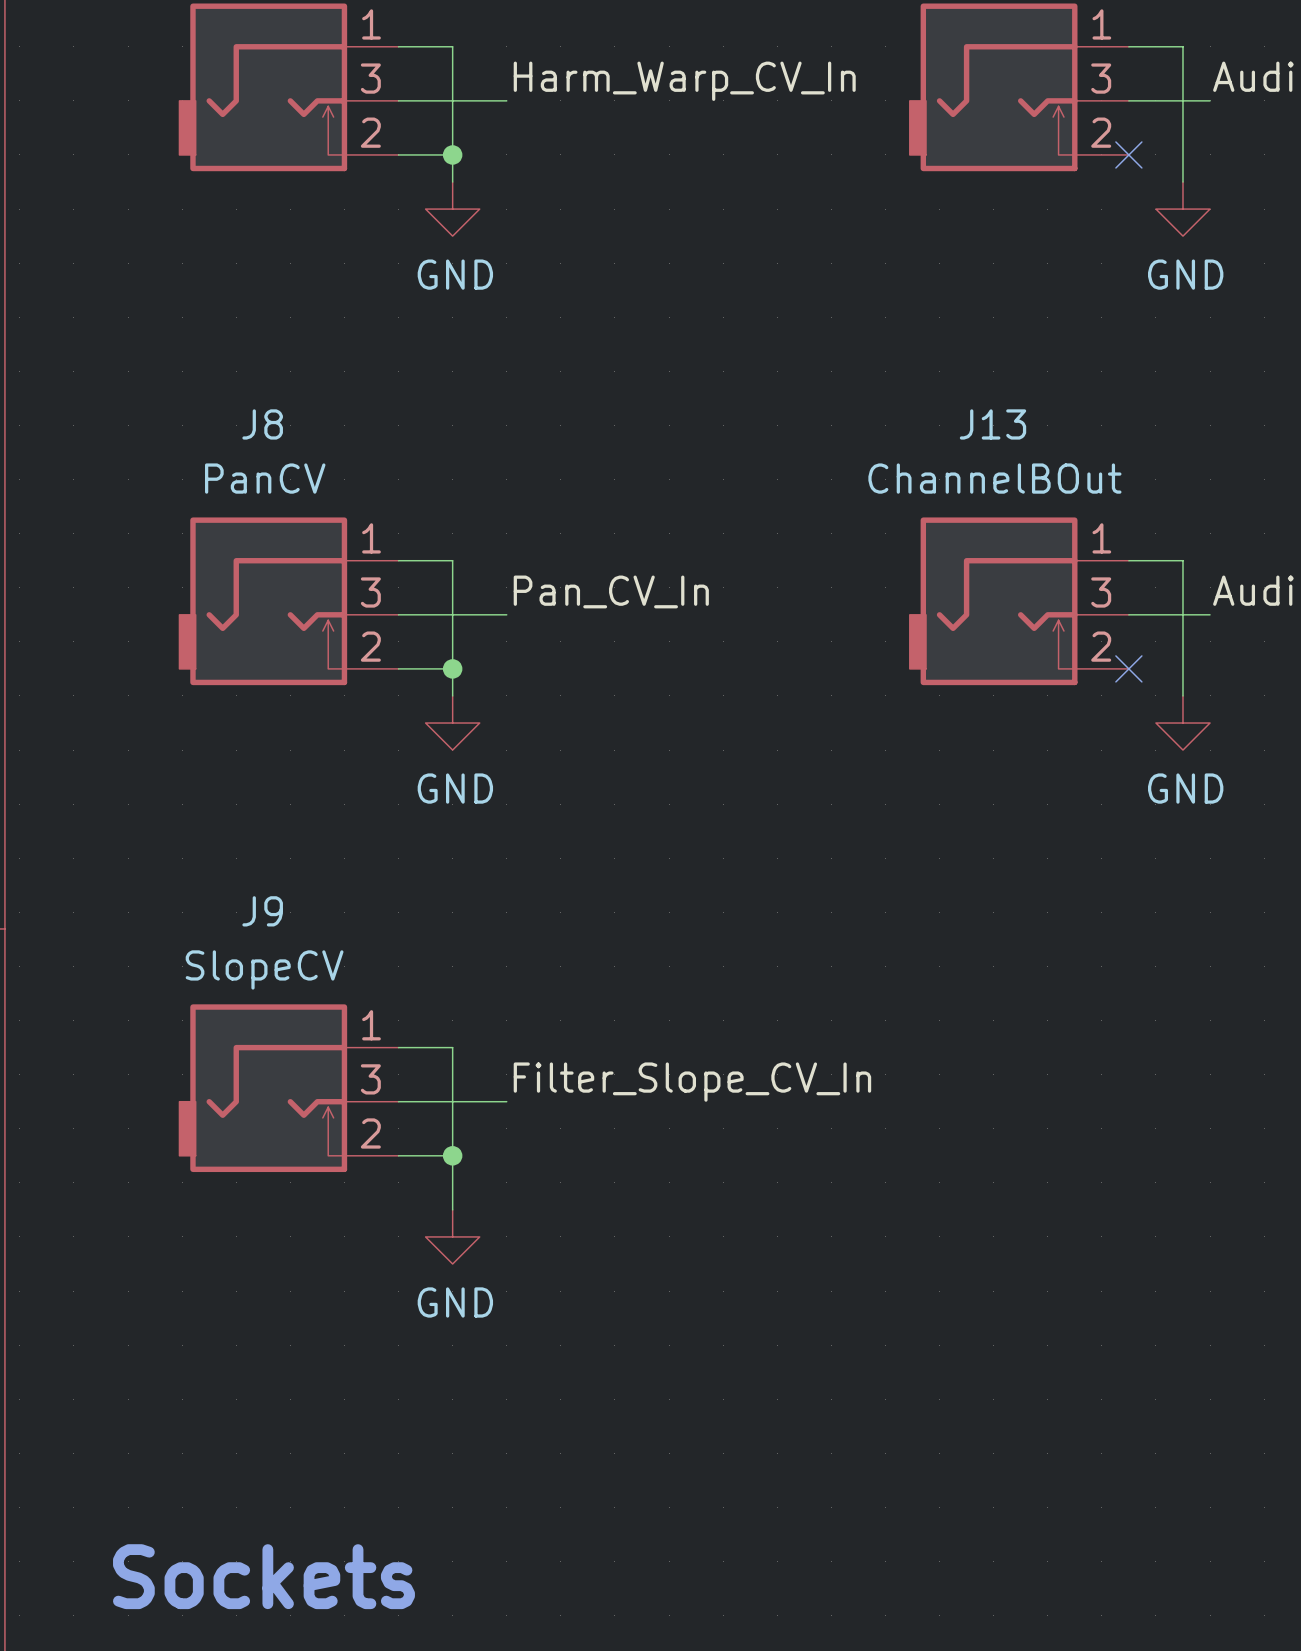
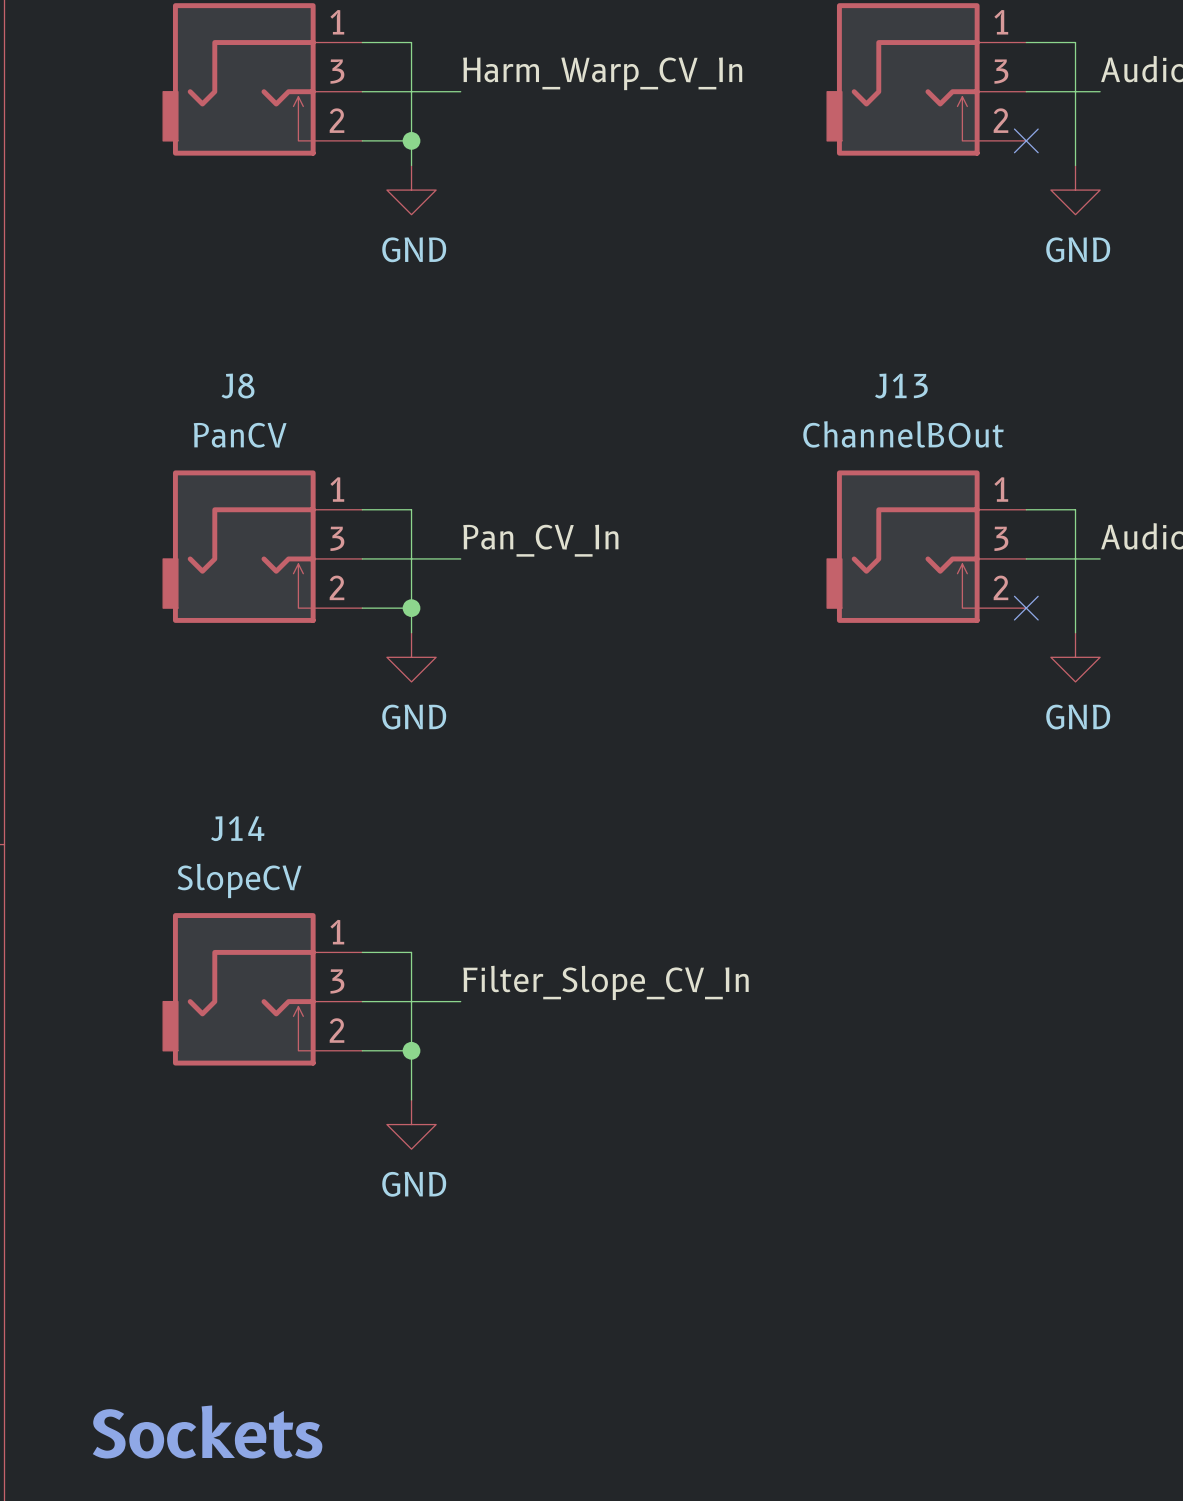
J9 name: J9 (262, 911) -> J14 (237, 828)

